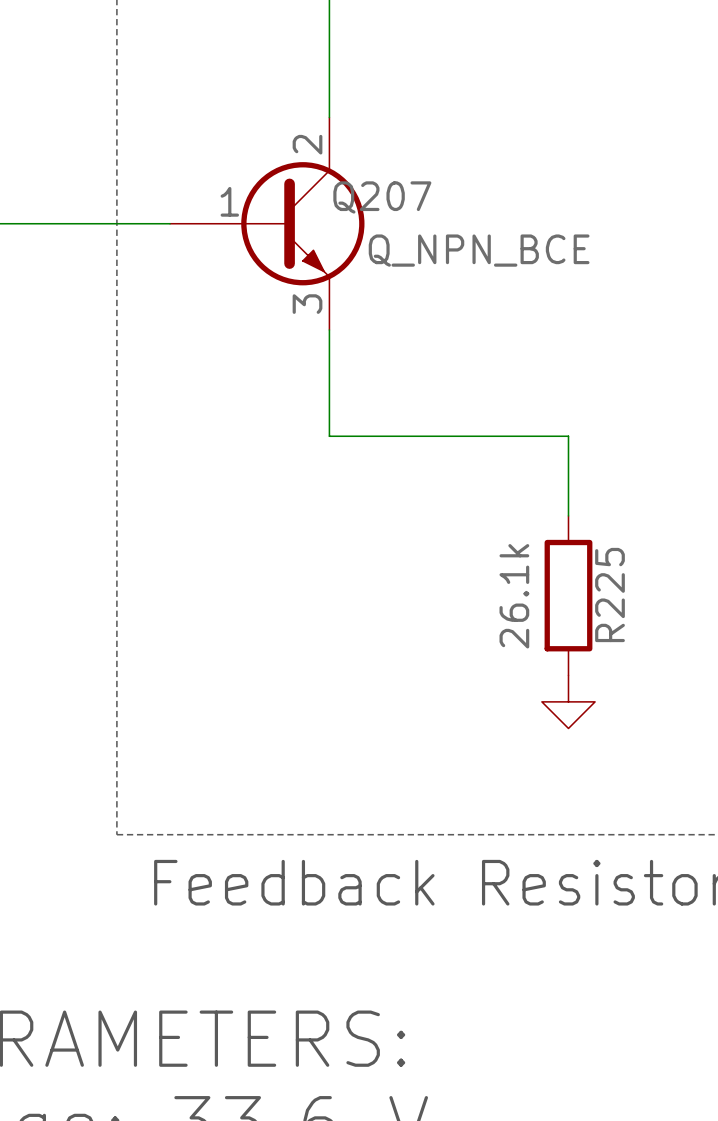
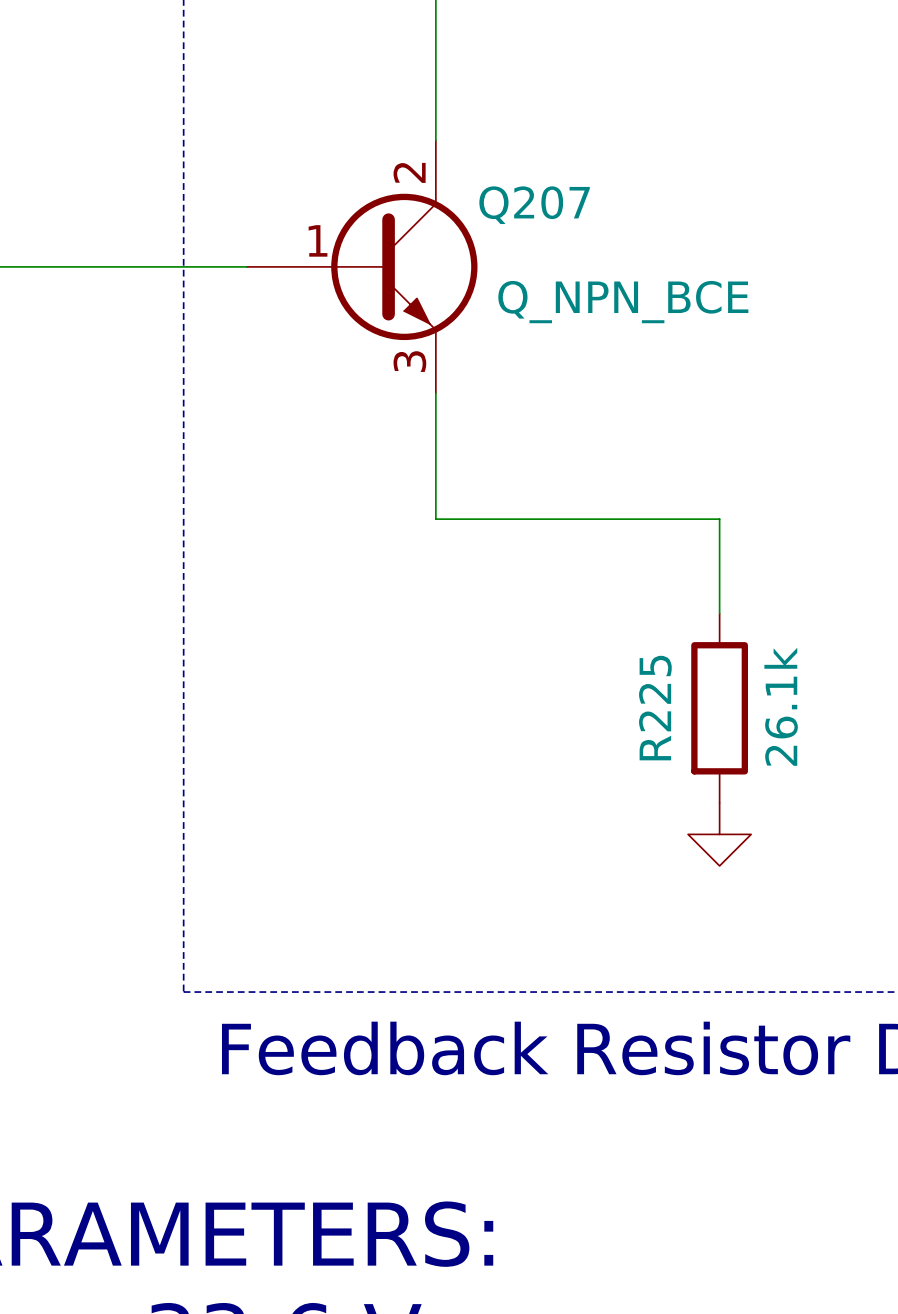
Q207 name position: Q207 (382, 197) -> Q207 (534, 205)
R225 name position: R225 (610, 595) -> R225 (655, 708)
R225 value position: 26.1k (514, 596) -> 26.1k (781, 706)

